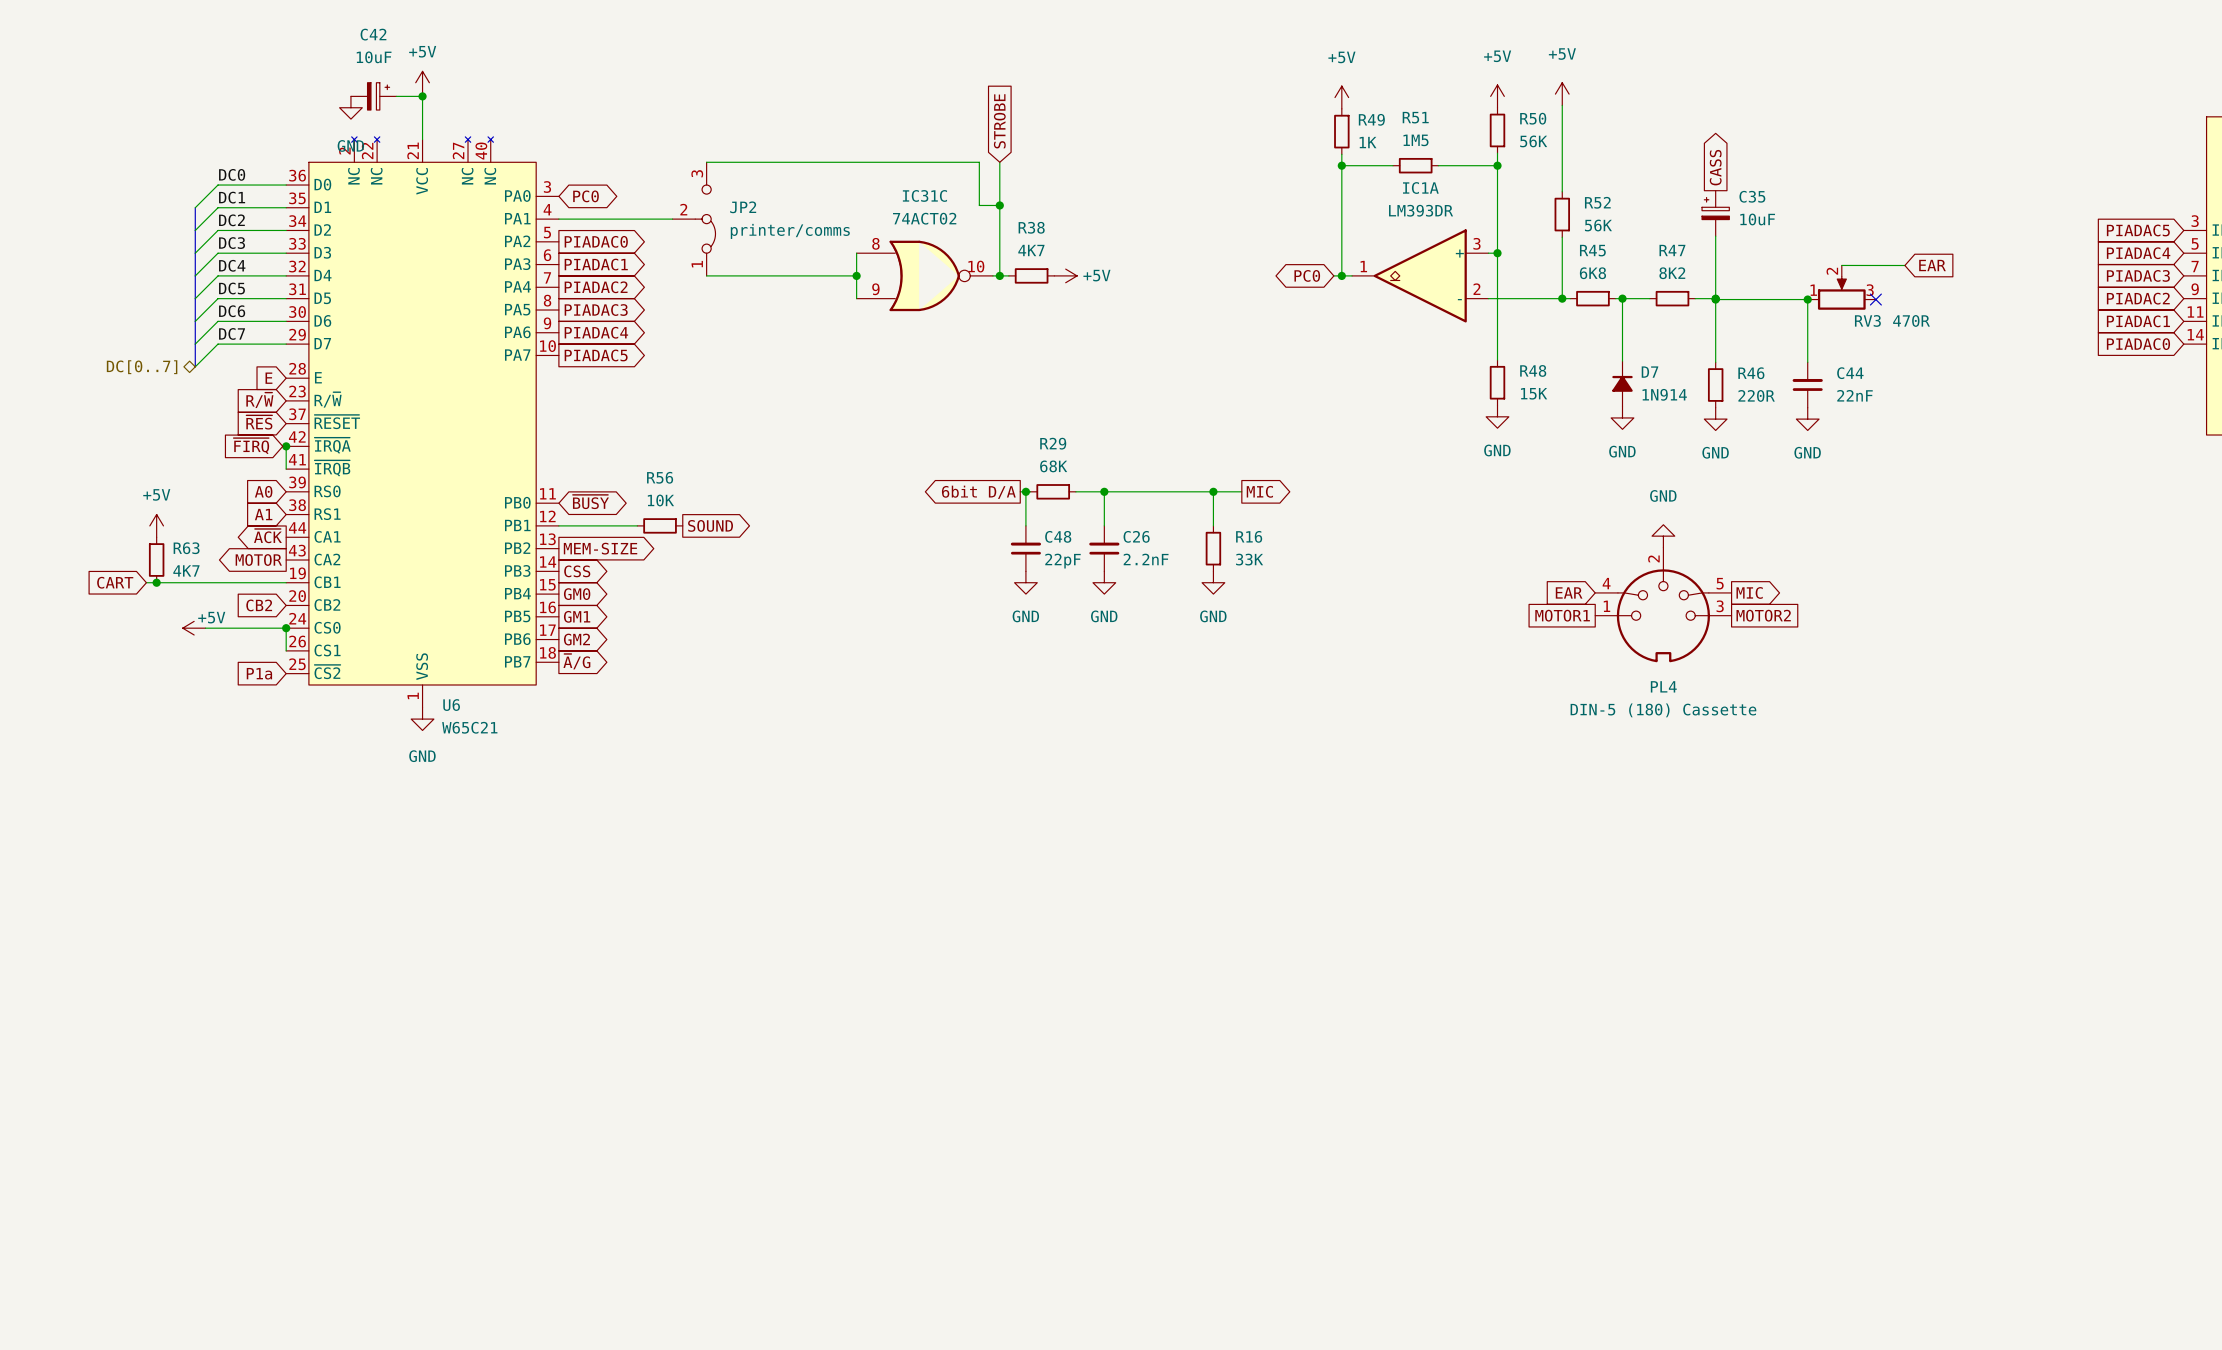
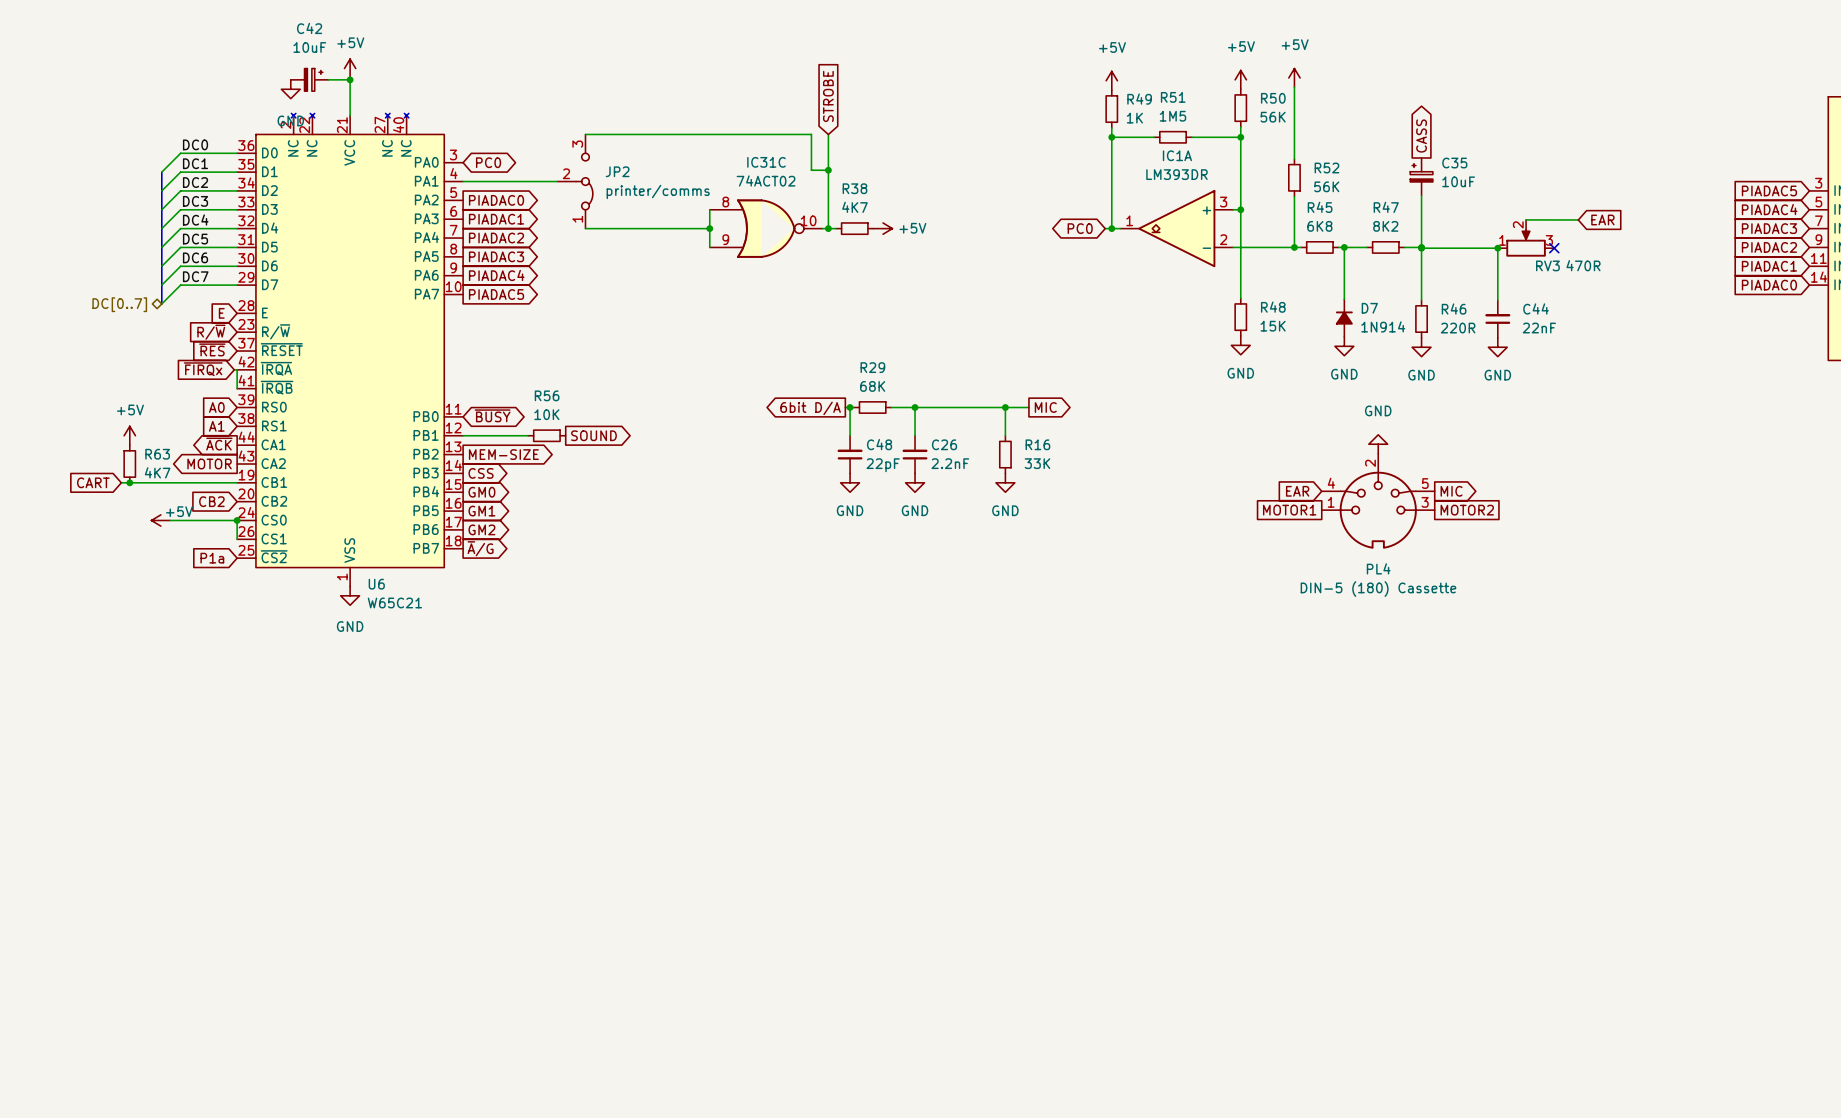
global label: ~{FIRQ} (251, 446) -> ~{FIRQx} (203, 369)
junction: (286, 446) -> none

